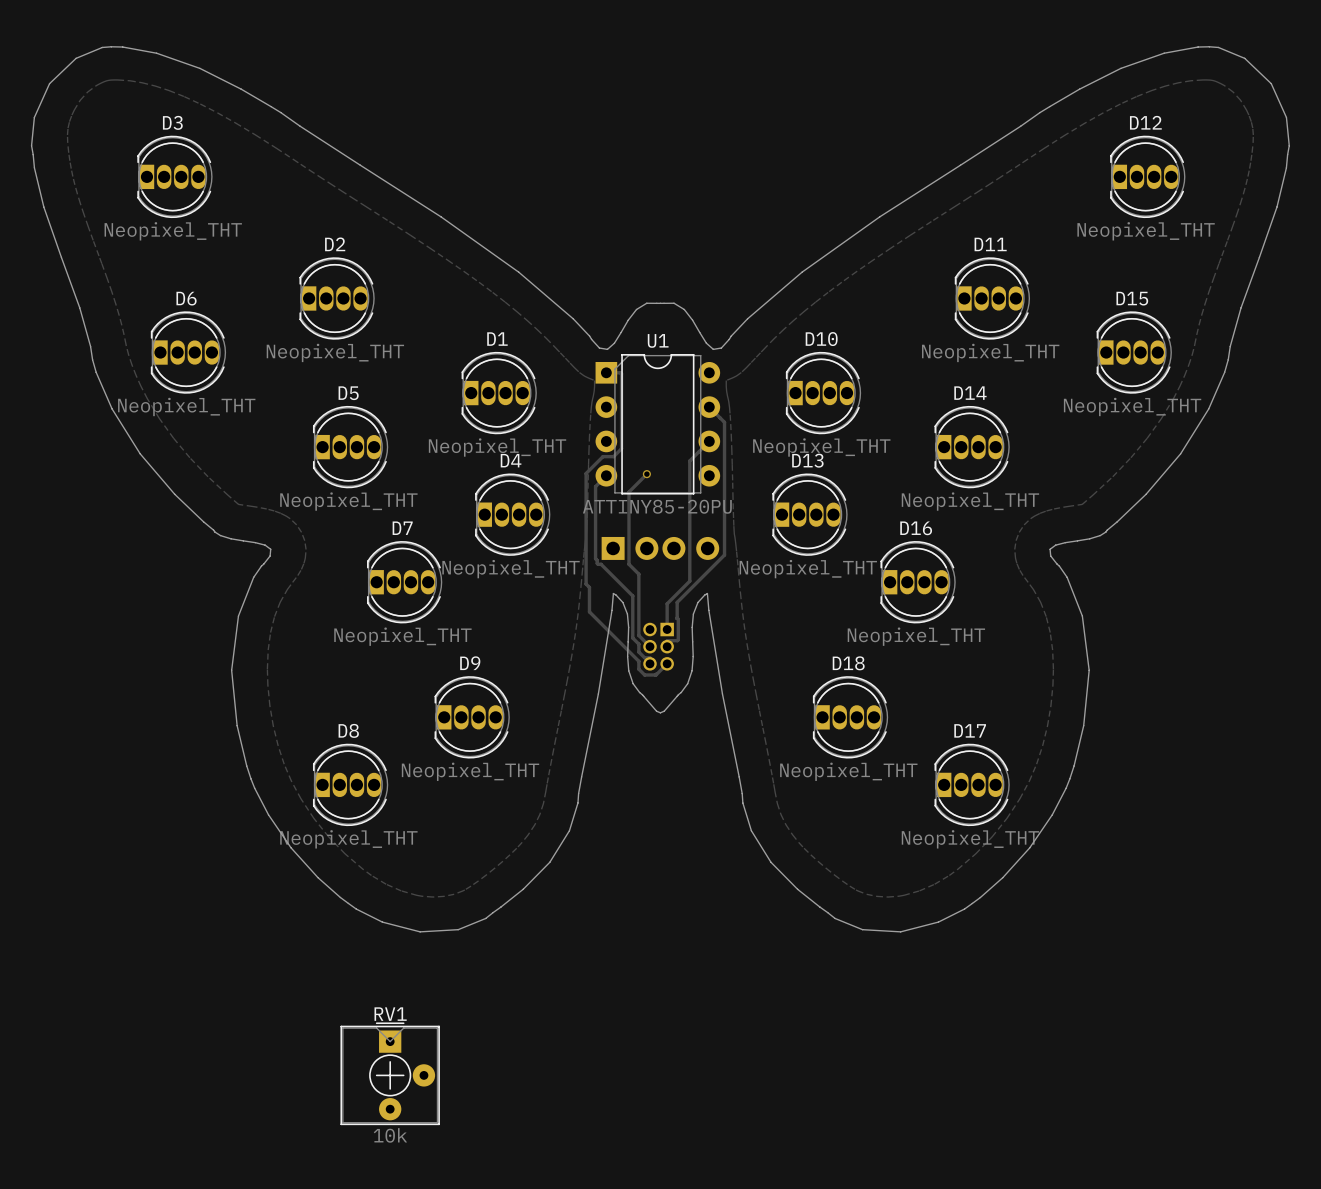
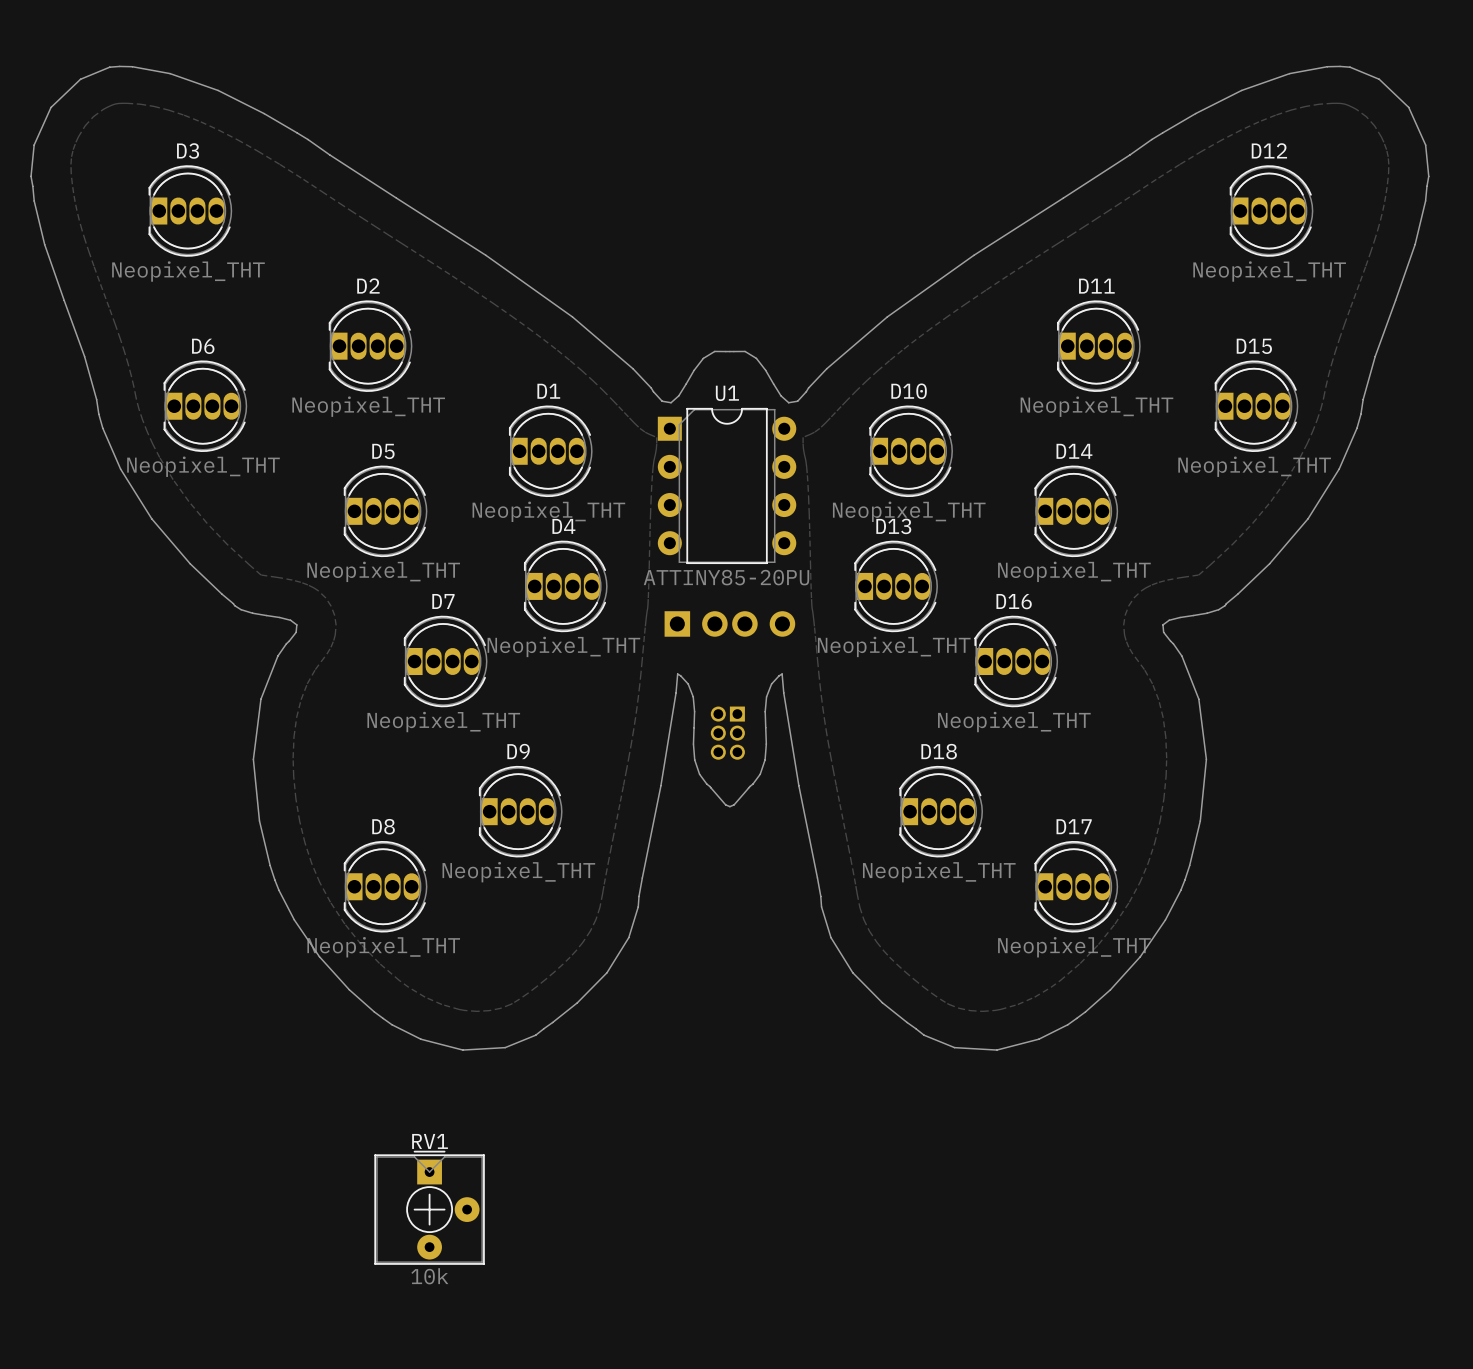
track: (606, 372) (621, 373) (621, 448) (613, 456) (602, 456) (586, 473) (586, 584) (589, 587) (589, 611) (638, 661) (638, 669) (644, 674) (656, 674) (667, 663) -> none
track: (709, 407) (724, 422) (724, 555) (677, 602) (678, 639) (667, 640) (667, 646) -> none
track: (709, 441) (689, 460) (689, 581) (667, 603) (667, 629) -> none
track: (646, 474) (629, 492) (629, 564) (638, 574) (638, 635) (650, 646) -> none
via: (646, 474) -> none
track: (606, 475) (595, 486) (595, 558) (598, 564) (601, 564) (632, 595) (632, 638) (638, 644) (638, 652) (644, 657) (650, 657) (650, 663) -> none

